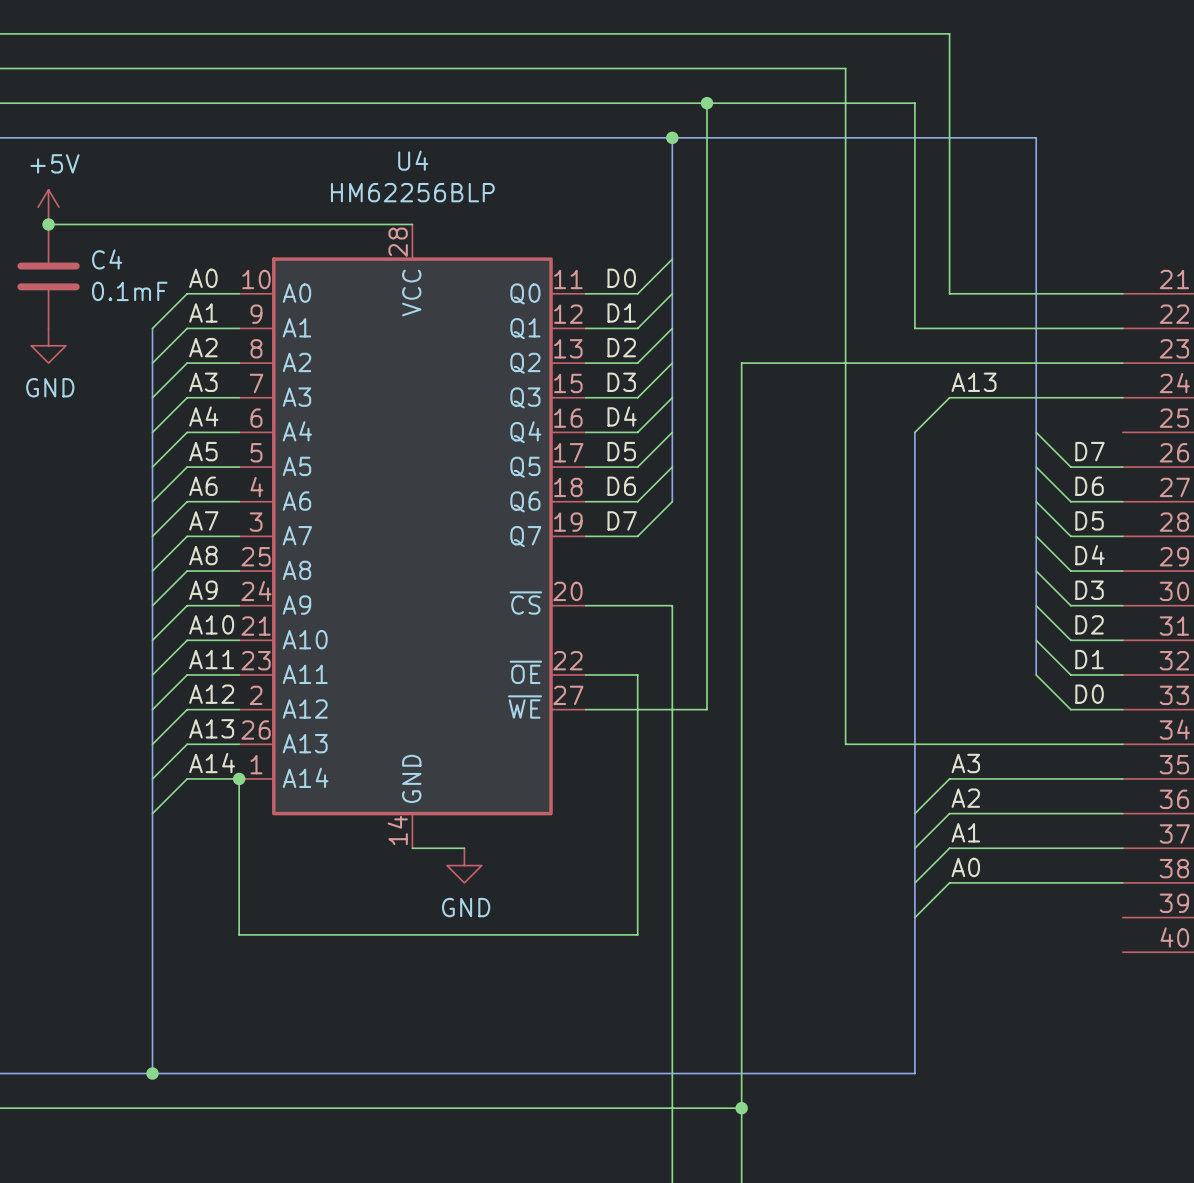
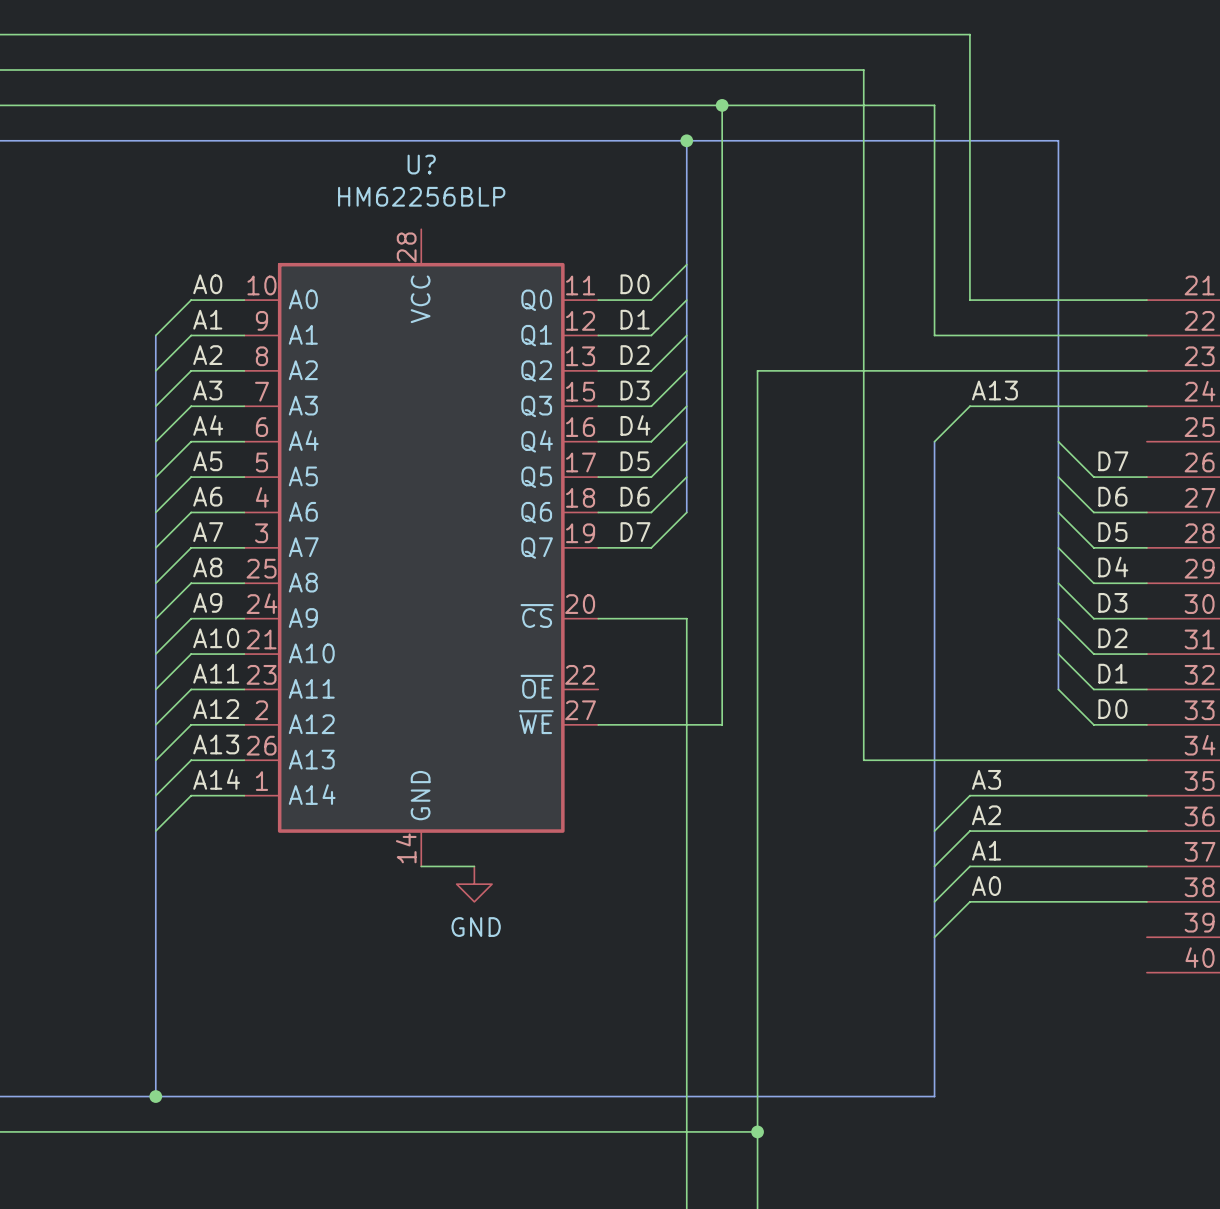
U4 name: U4 (413, 160) -> U? (421, 164)
power symbol: +5V (48, 207) -> none
wire: (48, 224) (412, 224) -> none
junction: (48, 224) -> none
C4: 0.1mF (48, 276) -> none
power symbol: GND (48, 345) -> none
wire: (585, 674) (637, 674) (637, 934) (239, 934) (239, 778) -> none
junction: (239, 778) -> none

